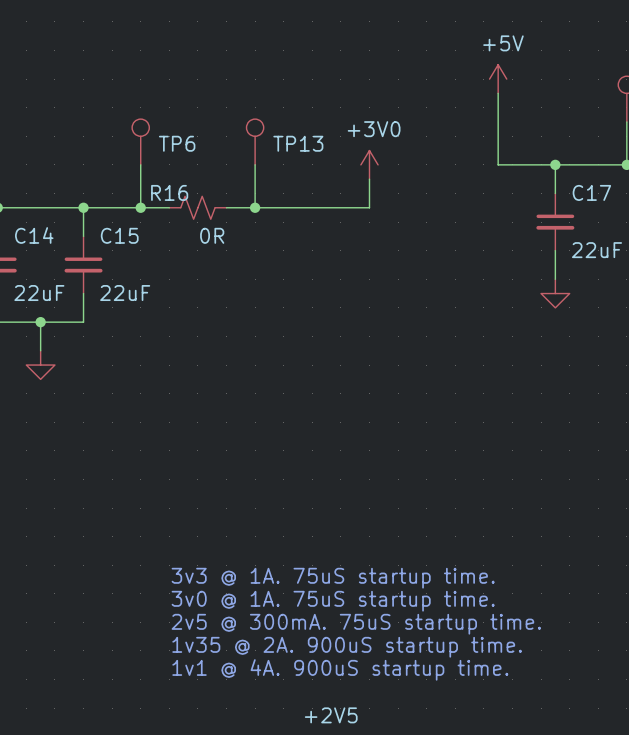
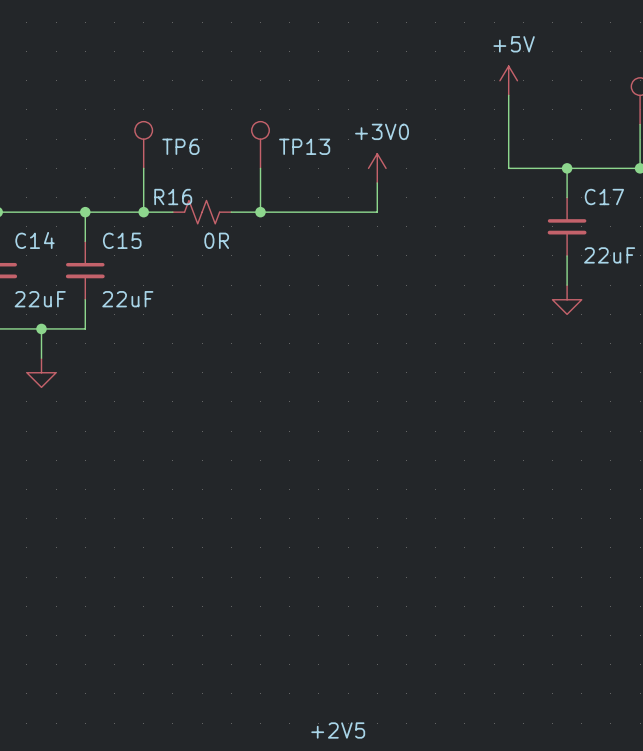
text: 3v3 @ 1A. 75uS startup time. (333, 578) -> none
text: 3v0 @ 1A. 75uS startup time. (333, 601) -> none
text: 2v5 @ 300mA. 75uS startup time. (356, 624) -> none
text: 1v35 @ 2A. 900uS startup time. (347, 647) -> none
text: 1v1 @ 4A. 900uS startup time. (340, 669) -> none

